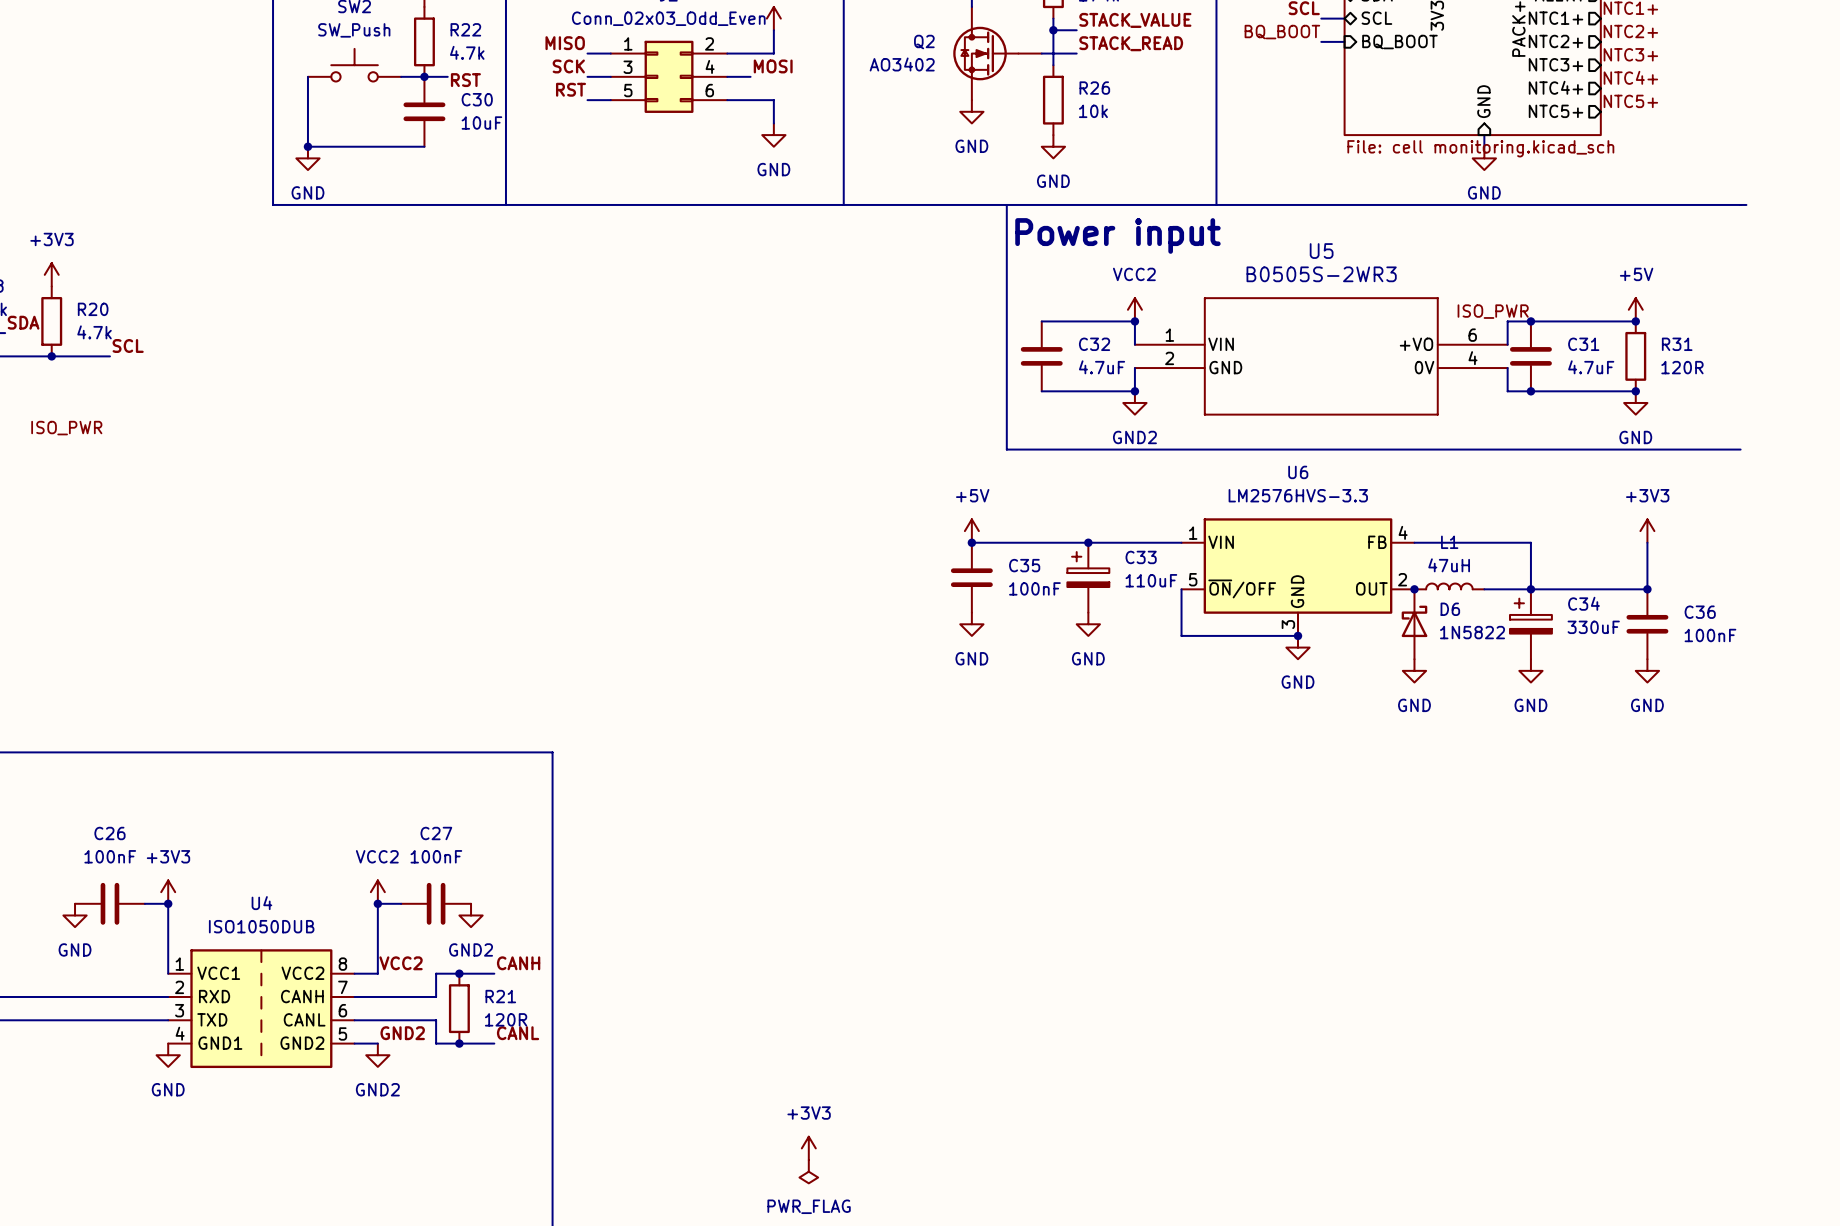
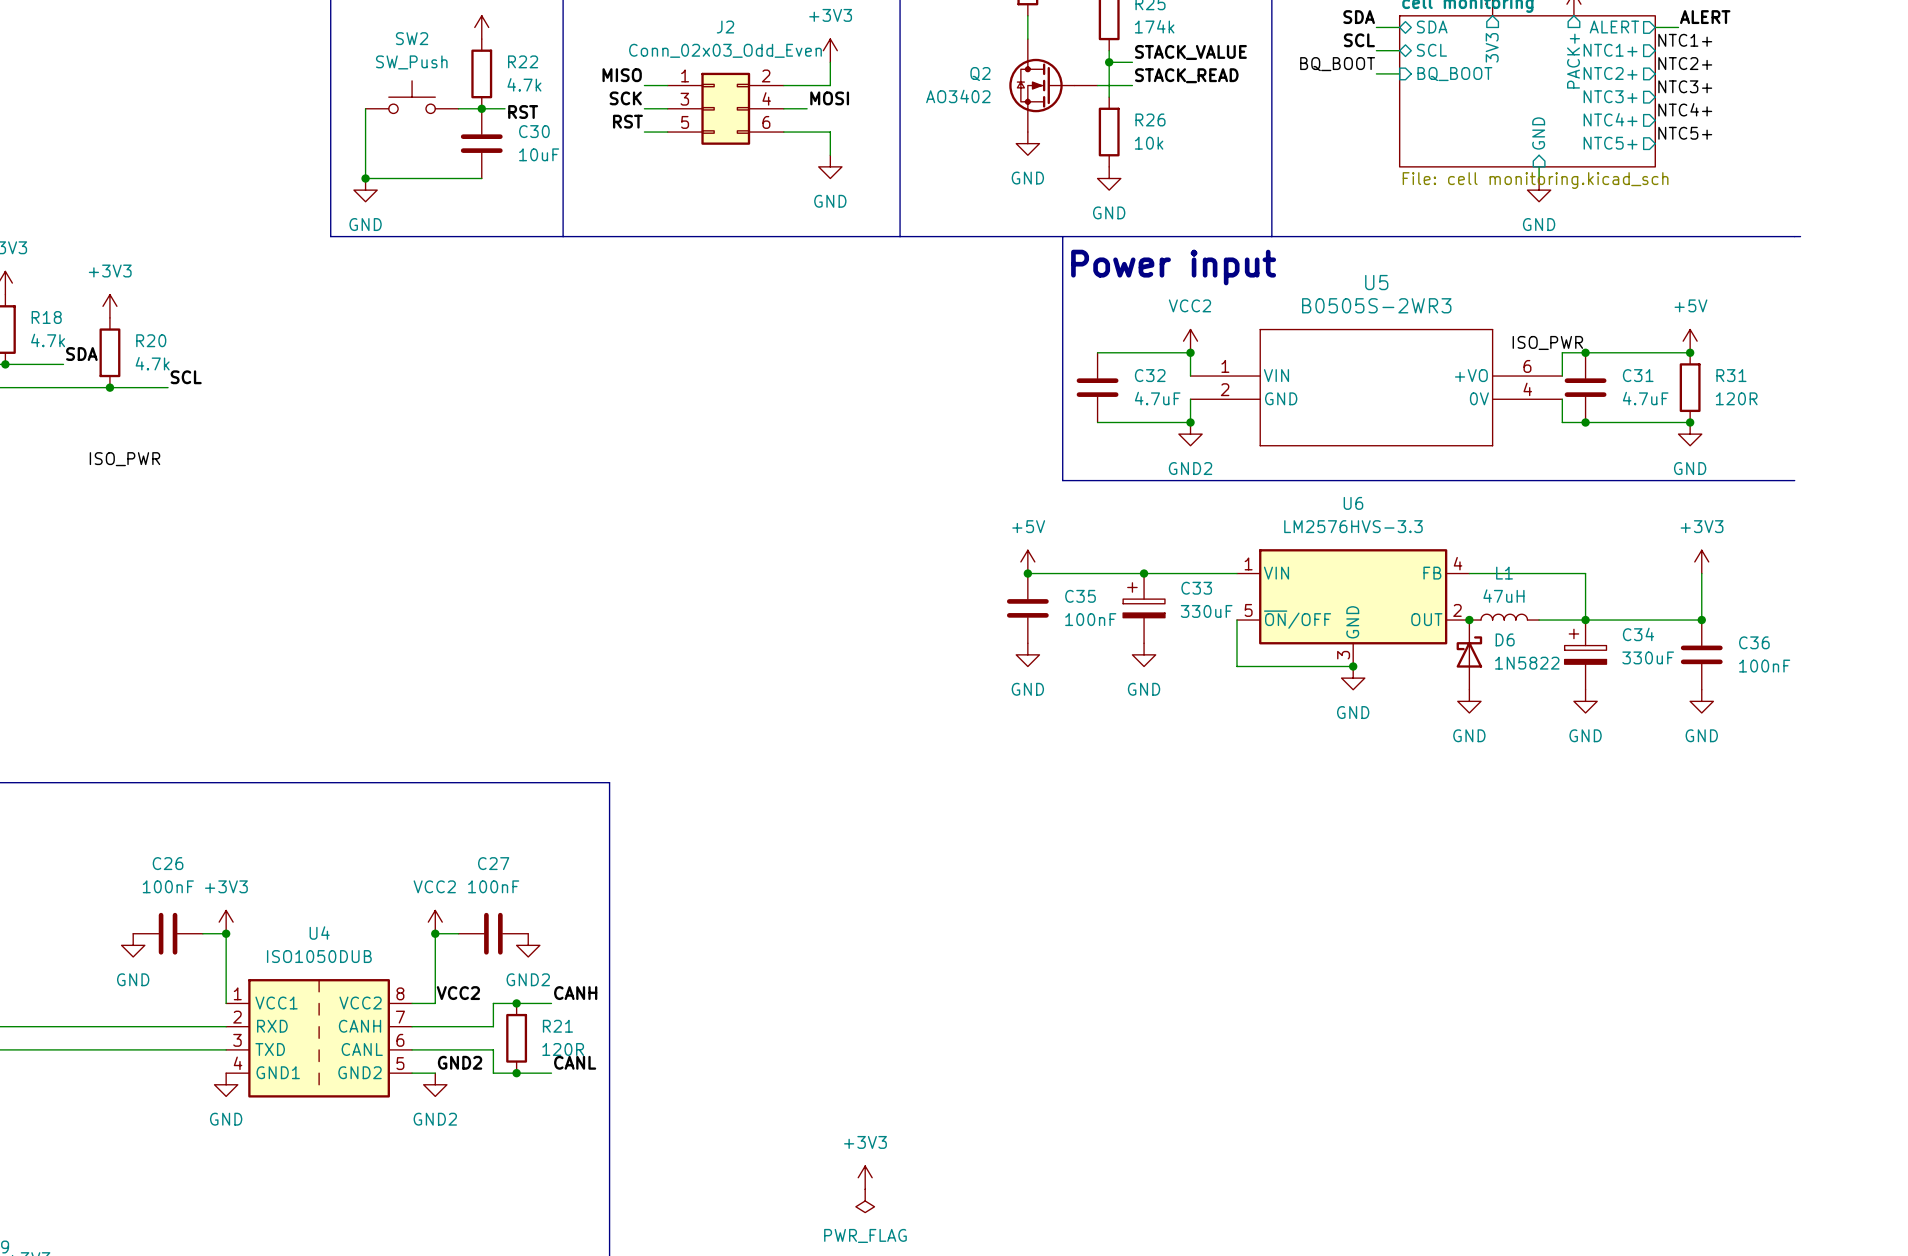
C33 value: 110uF (1151, 580) -> 330uF (1206, 611)

